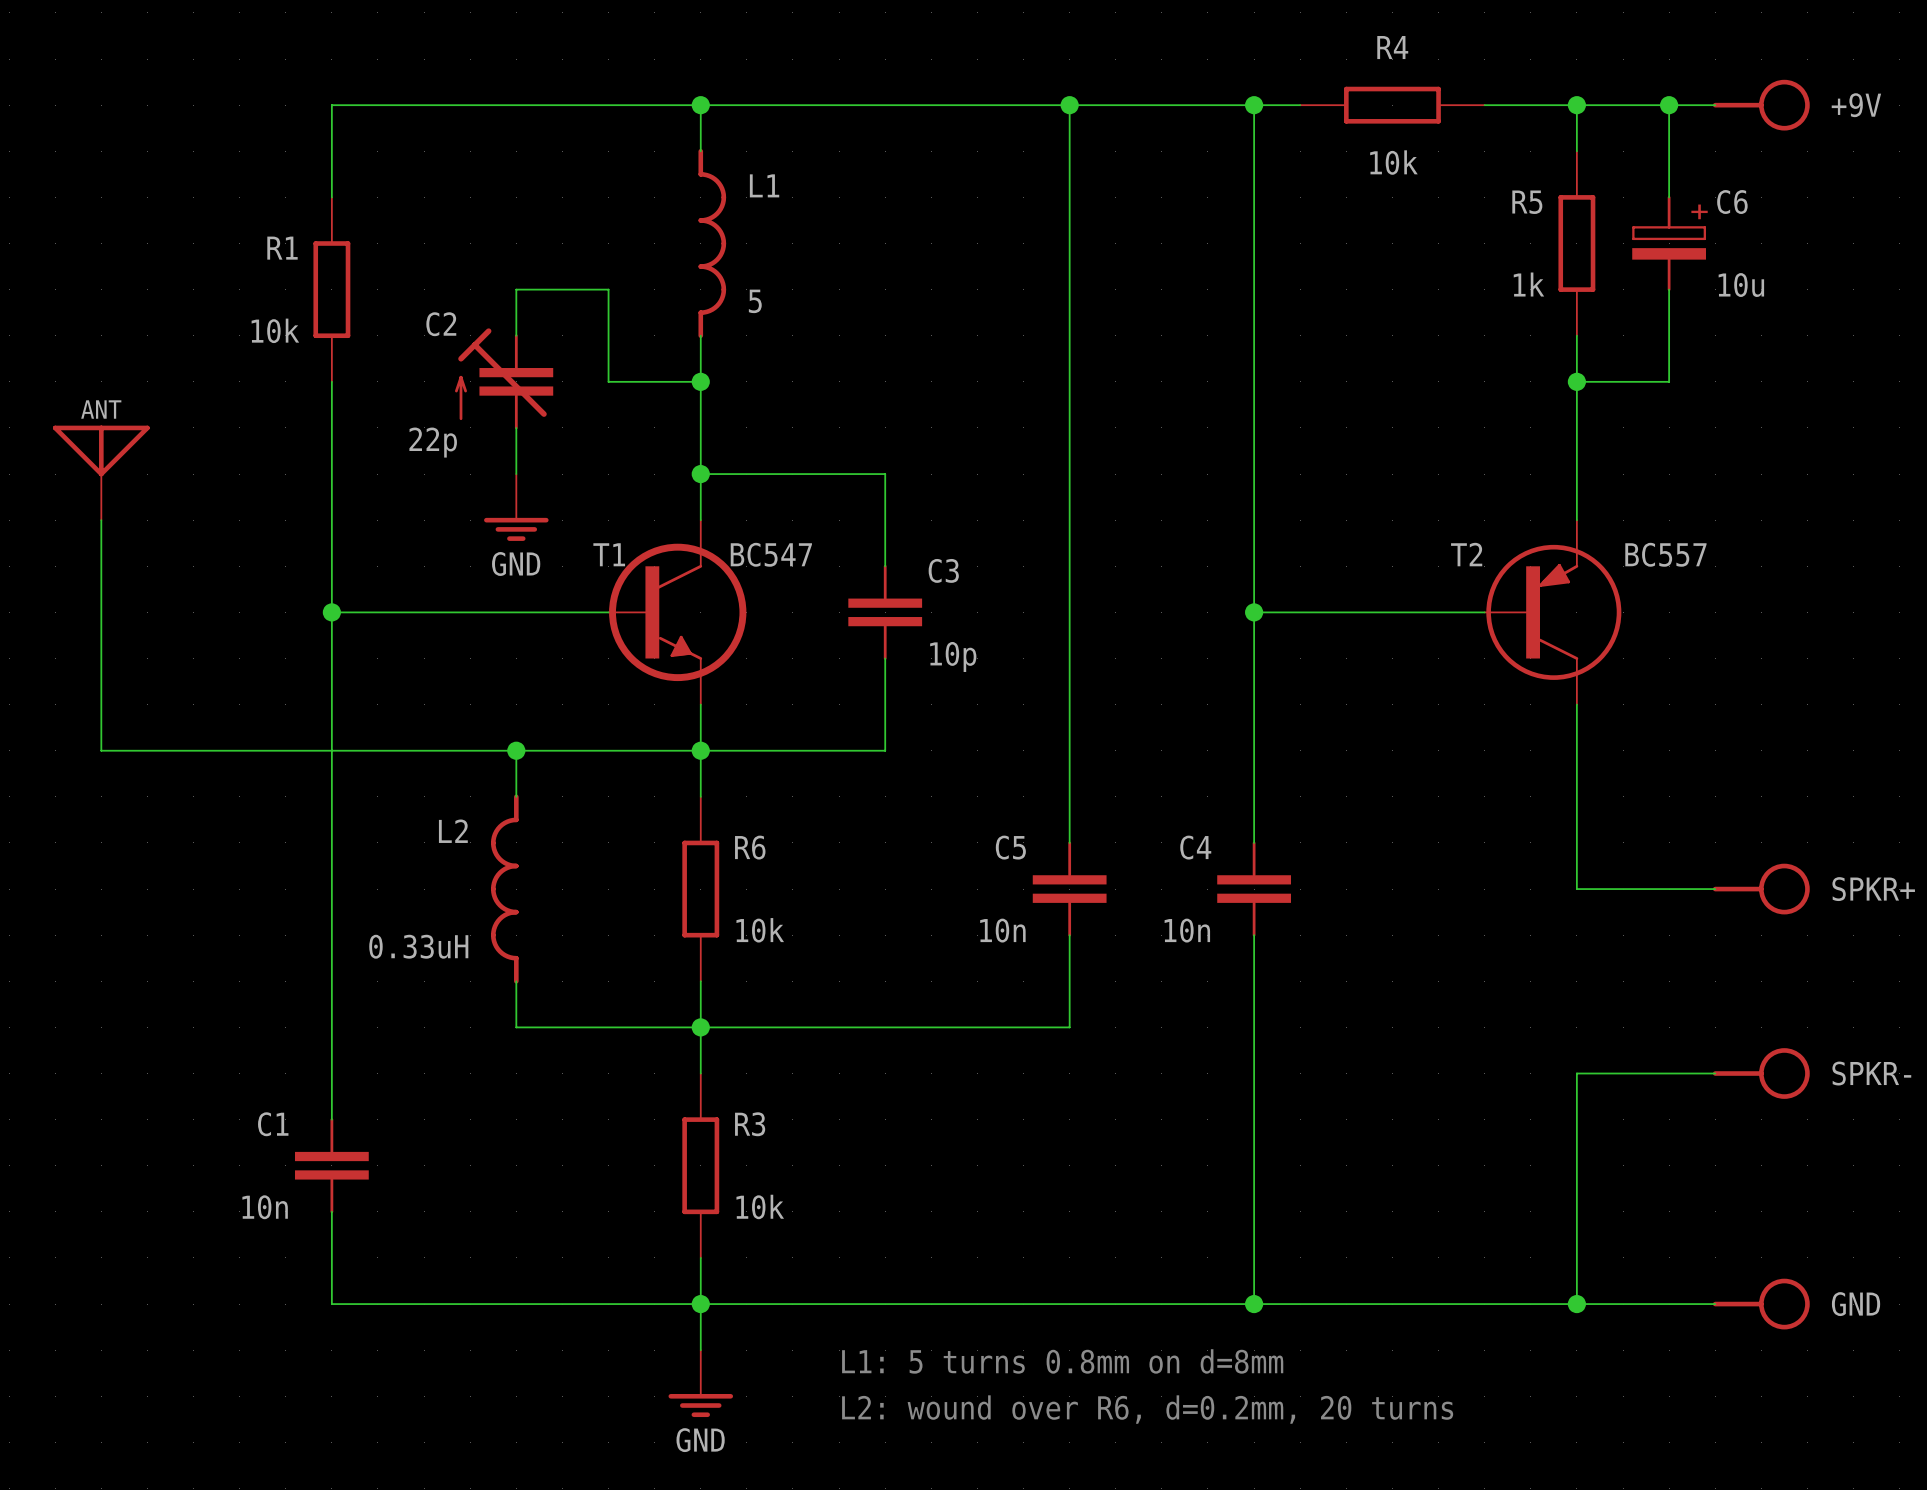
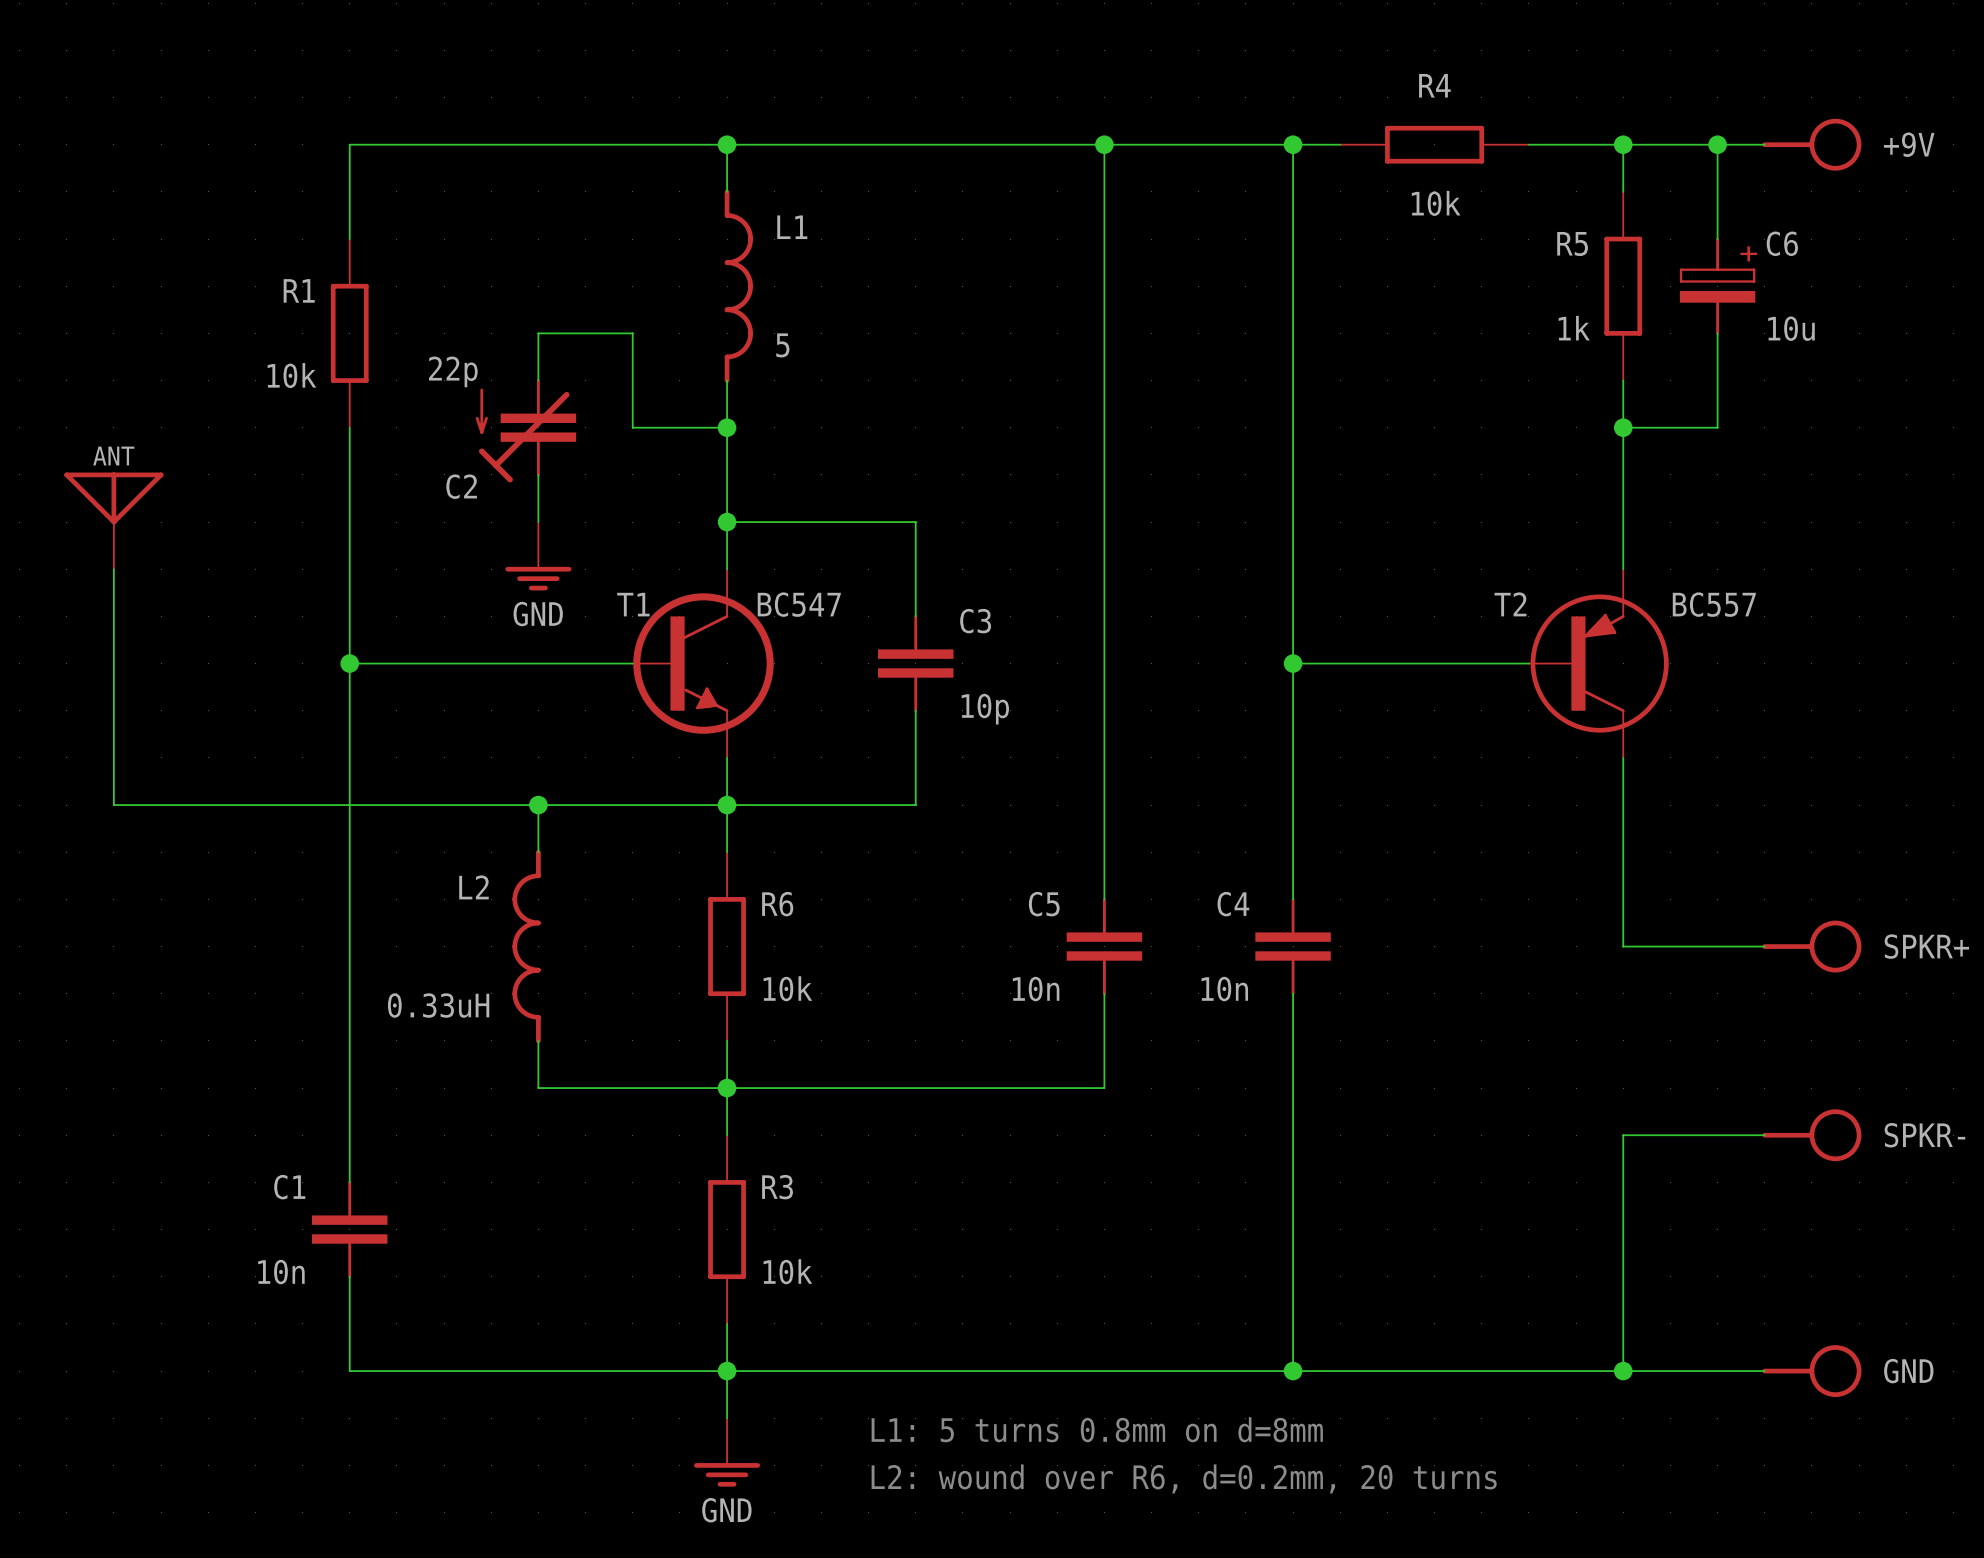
C2 flip: as is (504, 378) -> up-down (525, 430)

